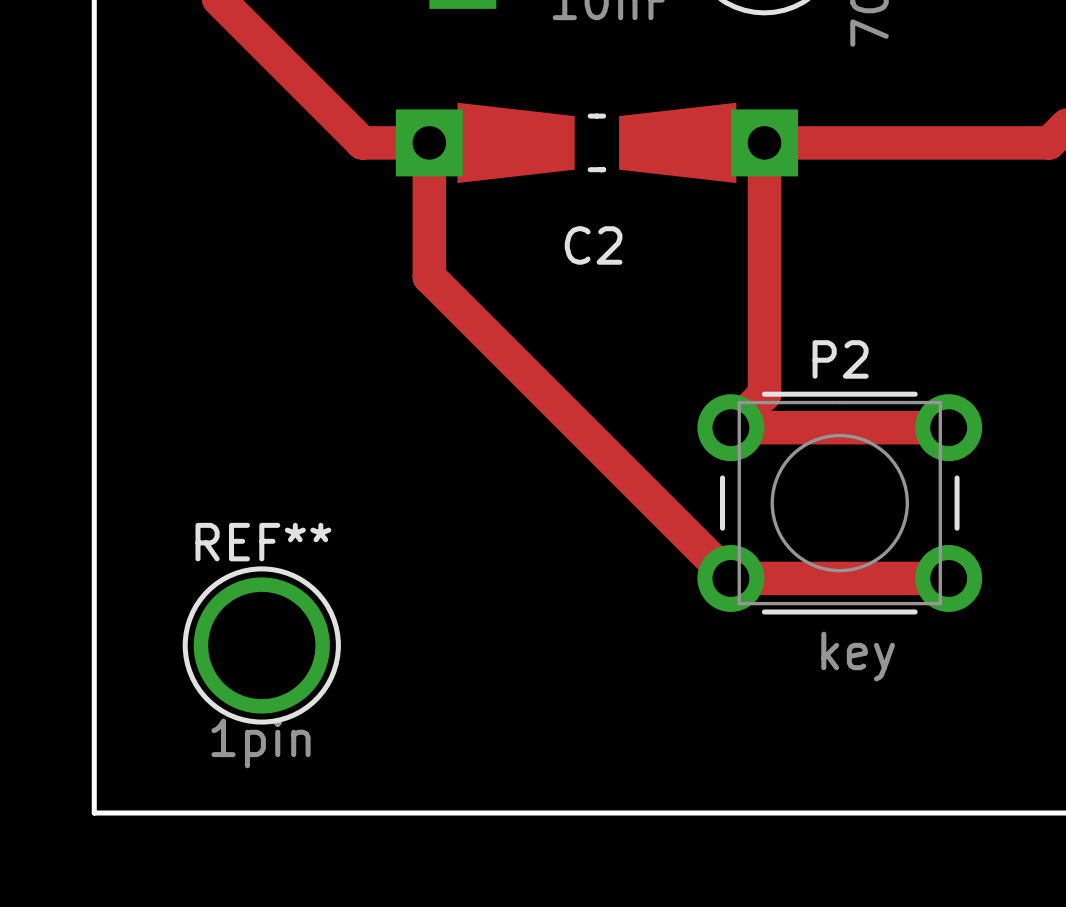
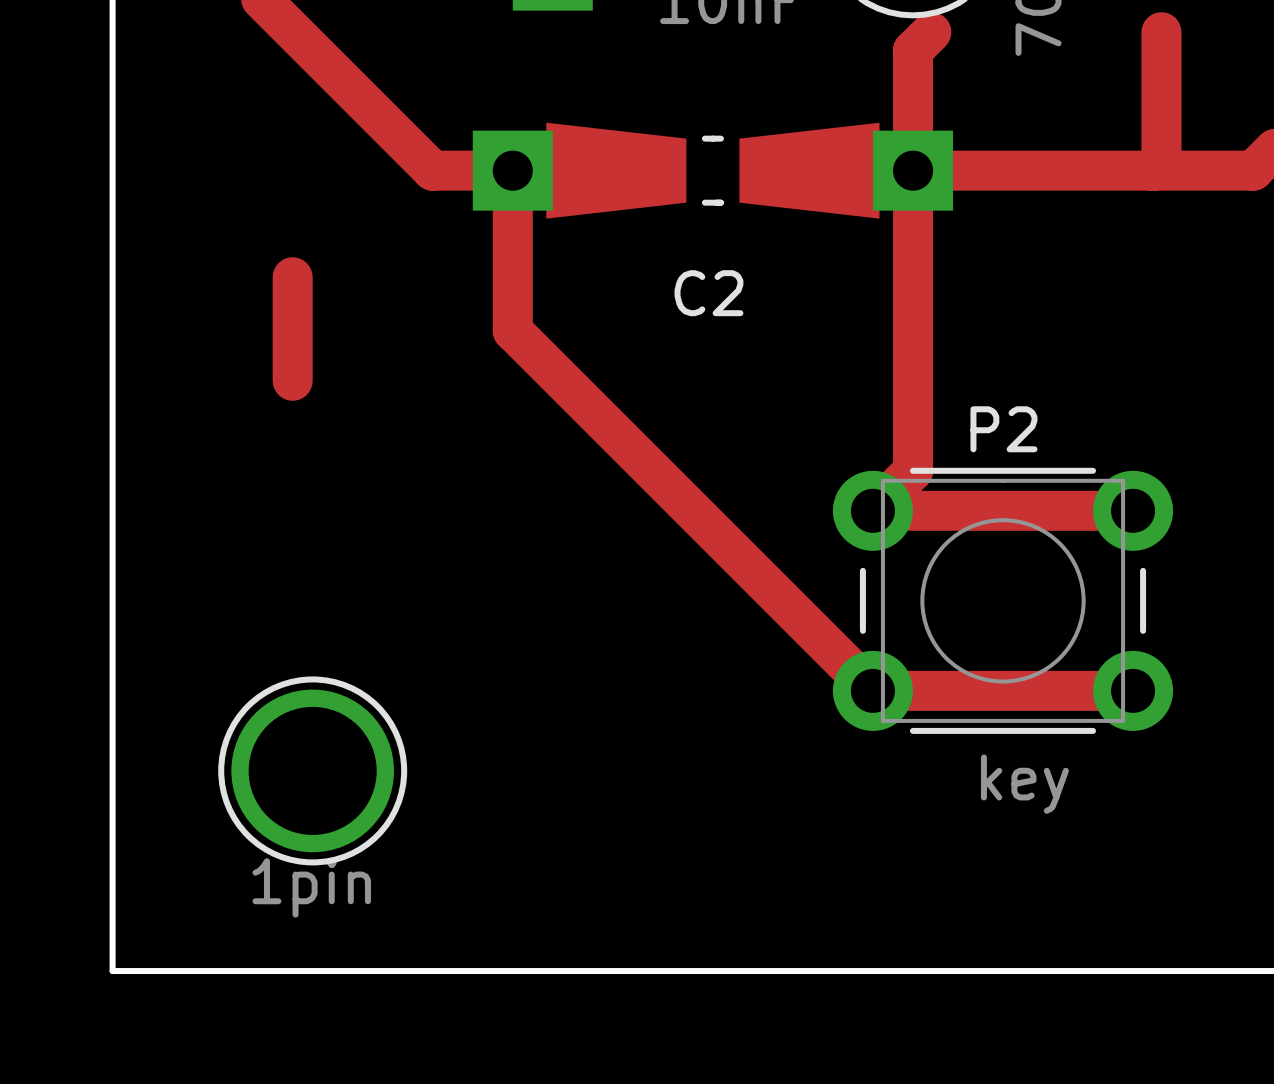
top track: none -> (931, 32) (913, 50) (913, 170)
top track: none -> (1161, 32) (1161, 162) (1153, 170)
top track: none -> (292, 277) (292, 380)
REF** name: REF** (263, 542) -> none

